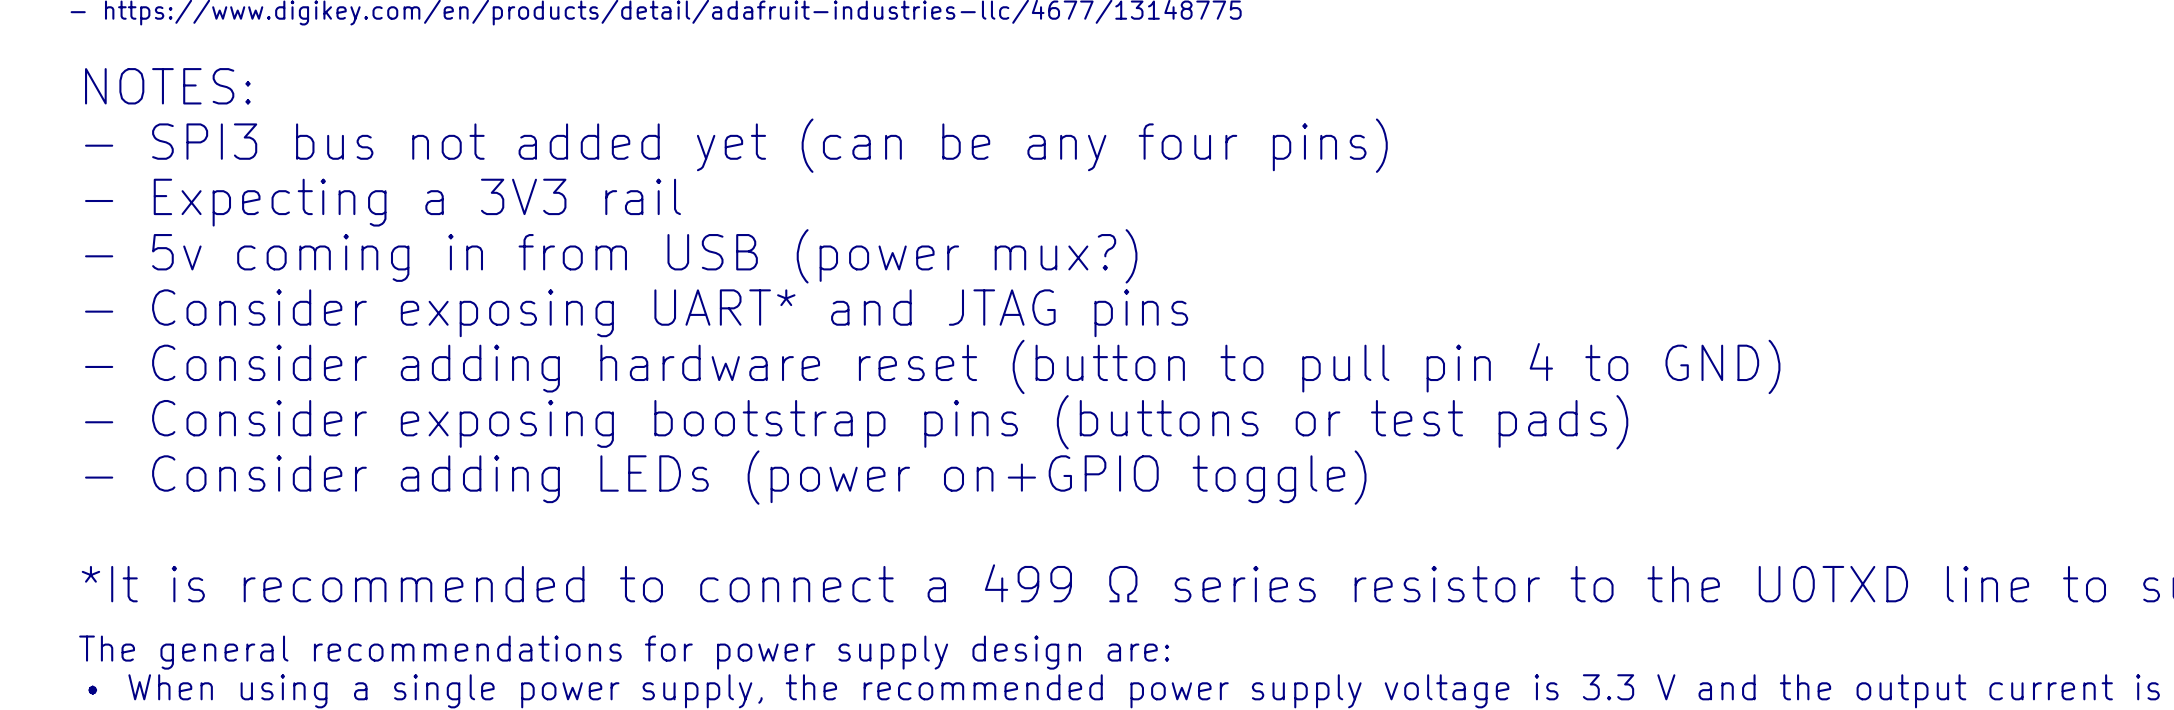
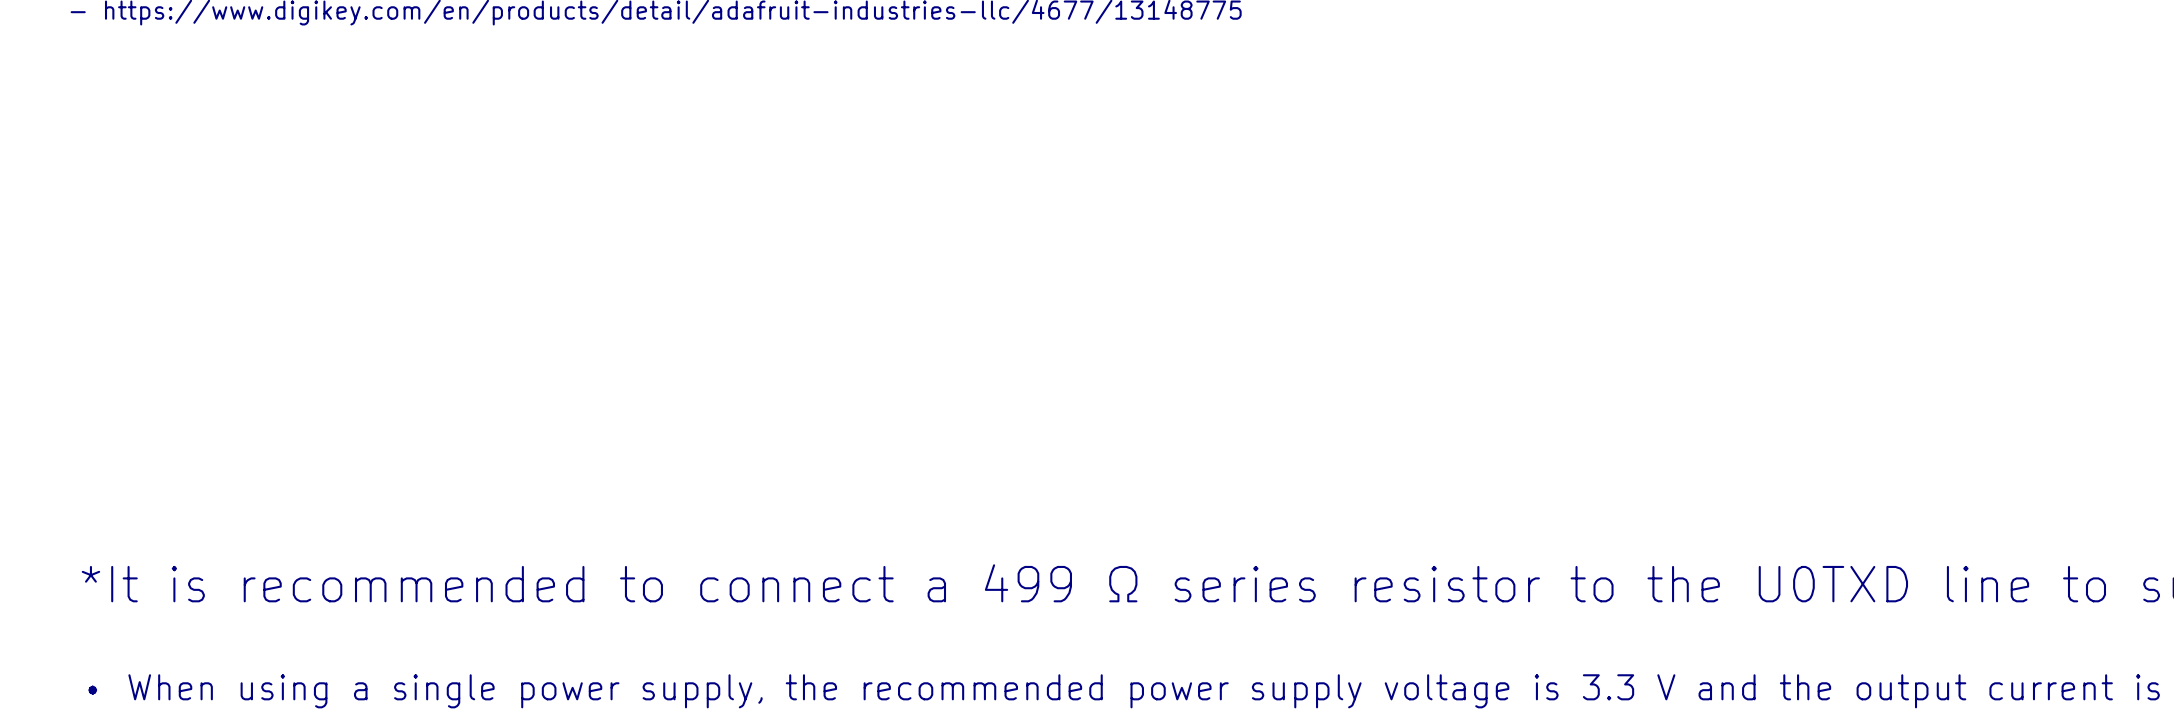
text: NOTES: (167, 86) -> none
text: - SPI3 bus not added yet (can be any four pins) (736, 145) -> none
text: - Expecting a 3V3 rail (382, 202) -> none
text: - 5v coming in from USB (power mux?) (611, 256) -> none
text: - Consider exposing UART* and JTAG pins (636, 313) -> none
text: - Consider adding hardware reset (button to pull pin 4 to GND) (932, 366) -> none
text: - Consider exposing bootstrap pins (buttons or test pads) (856, 422) -> none
text: - Consider adding LEDs (power on+GPIO toggle) (725, 477) -> none
text: The general recommendations for power supply design are: (624, 652) -> none

